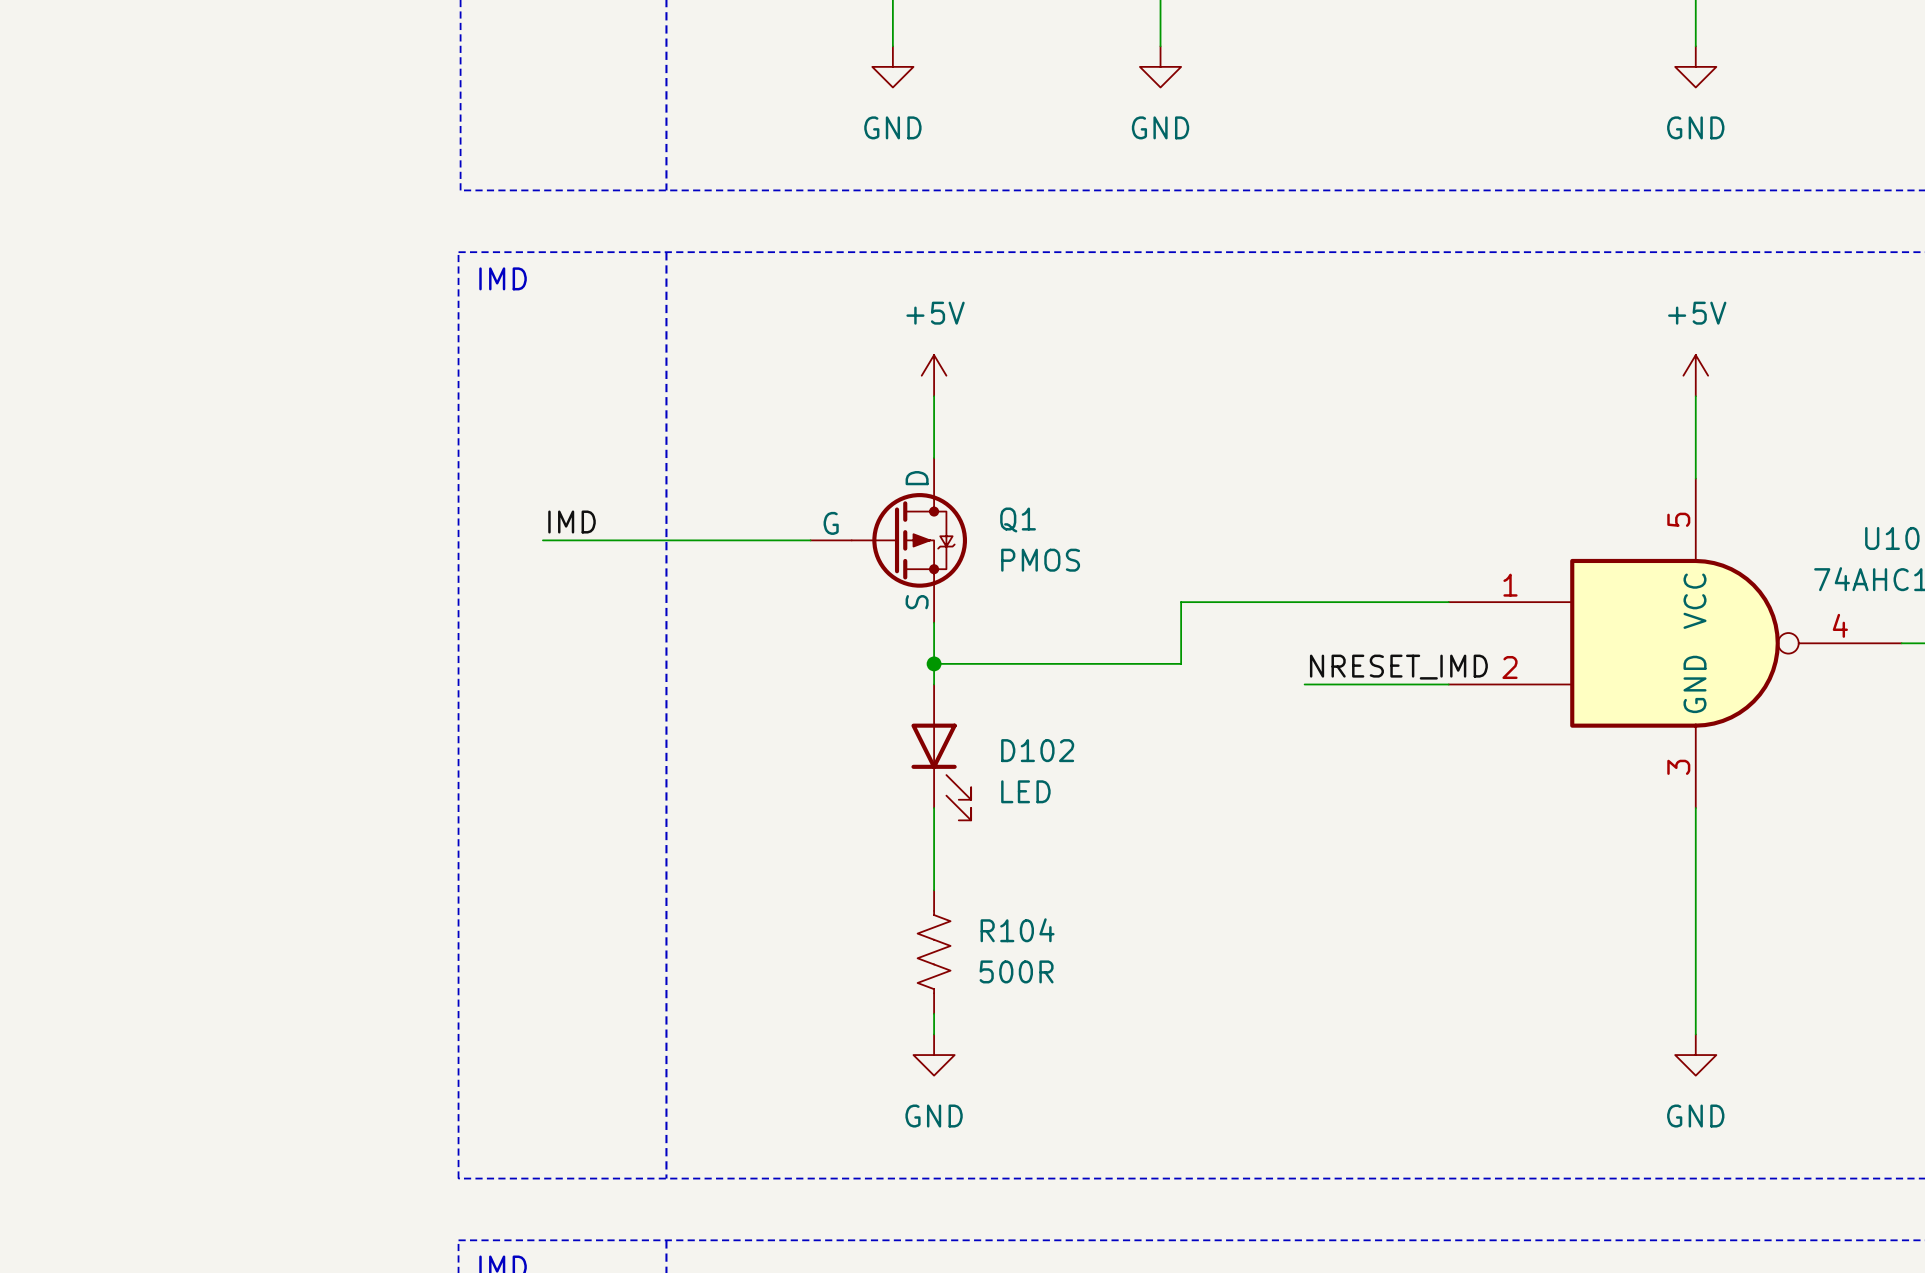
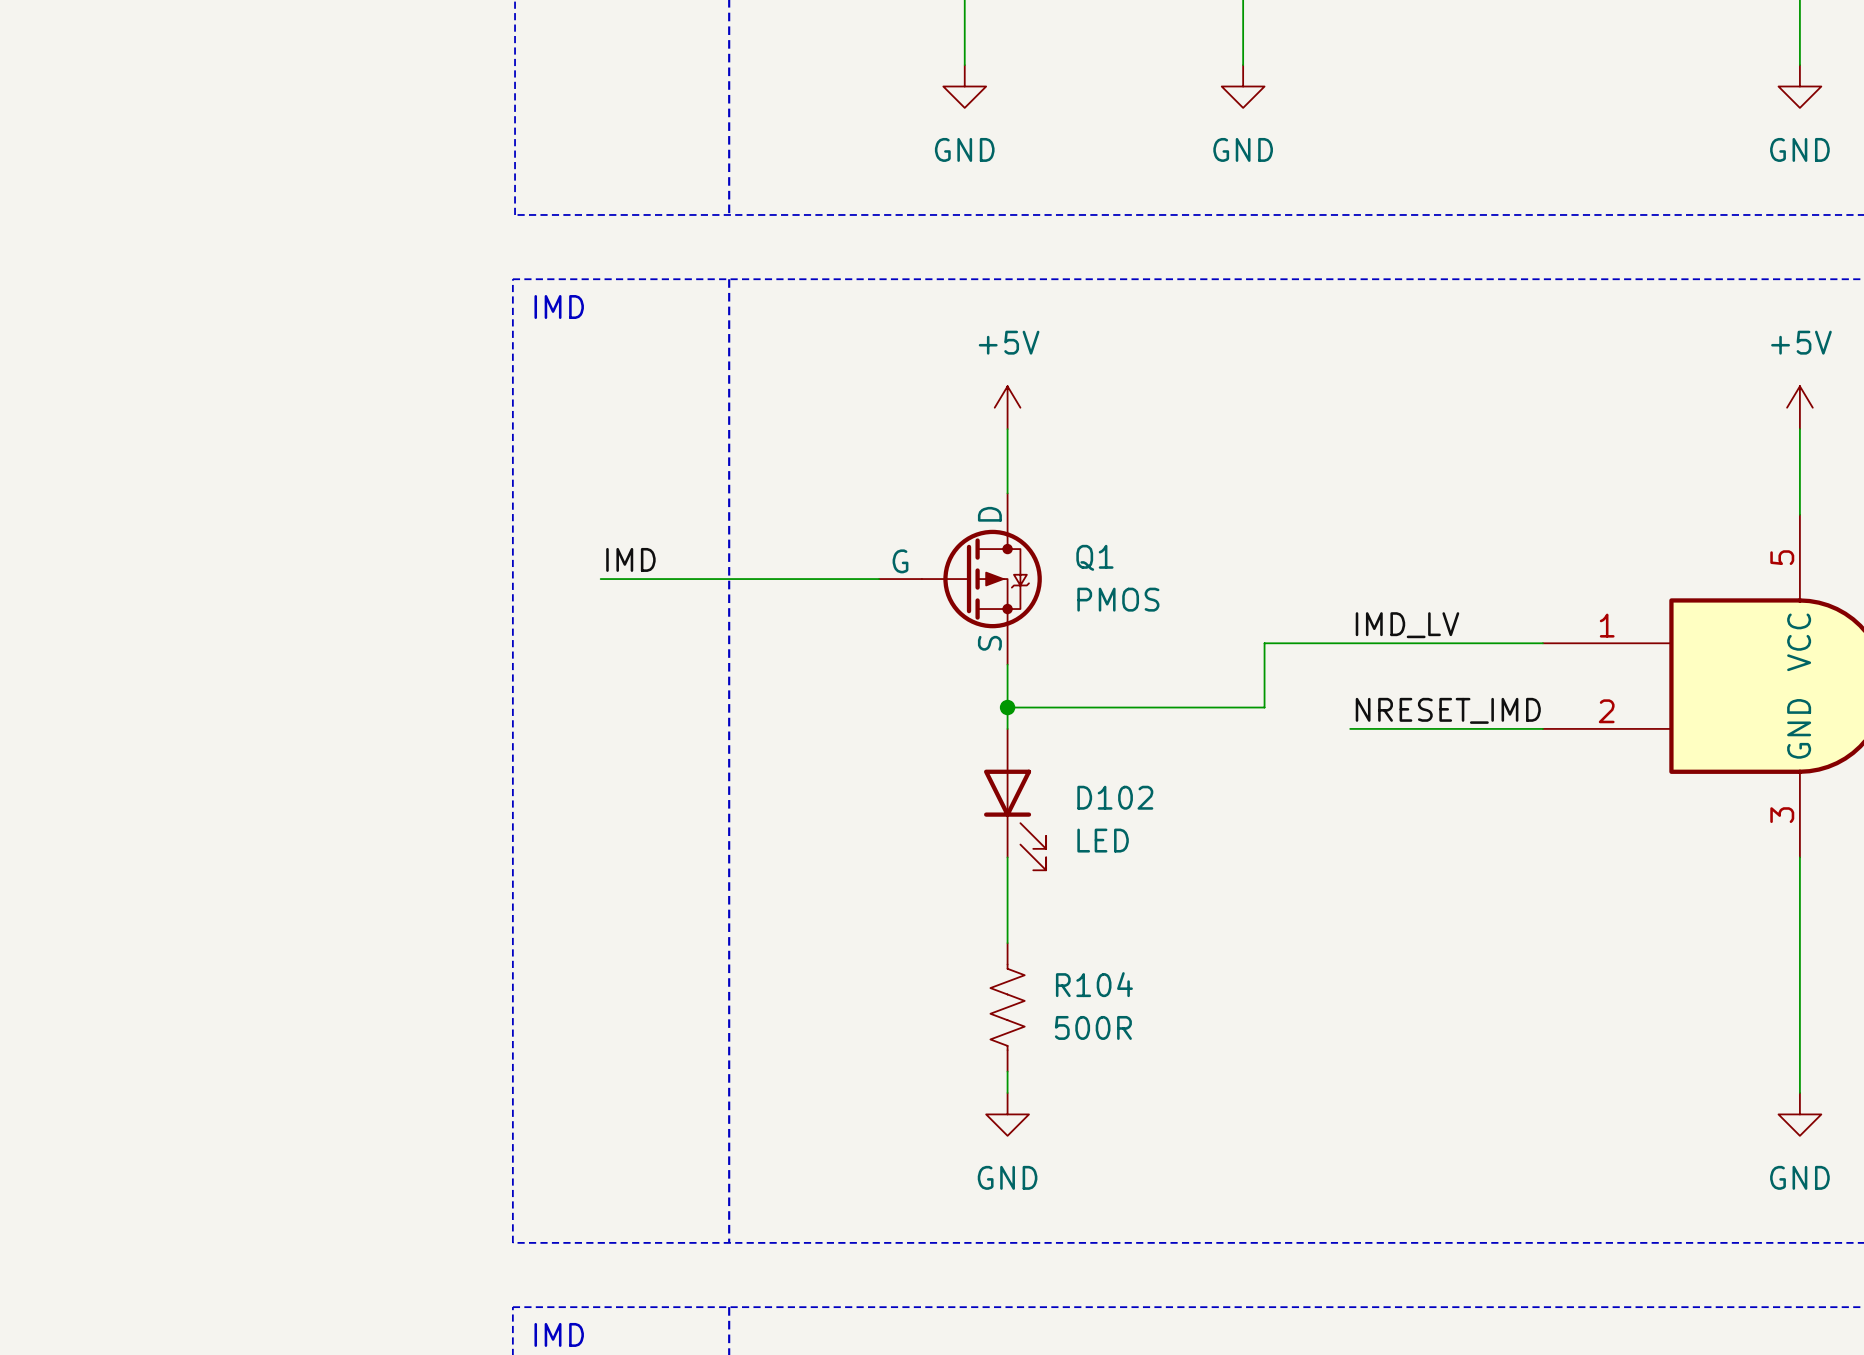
label: none -> IMD_LV (1407, 625)
label position: NRESET_IMD (1398, 667) -> NRESET_IMD (1448, 710)
wire: none -> (1350, 728) (1393, 728)

